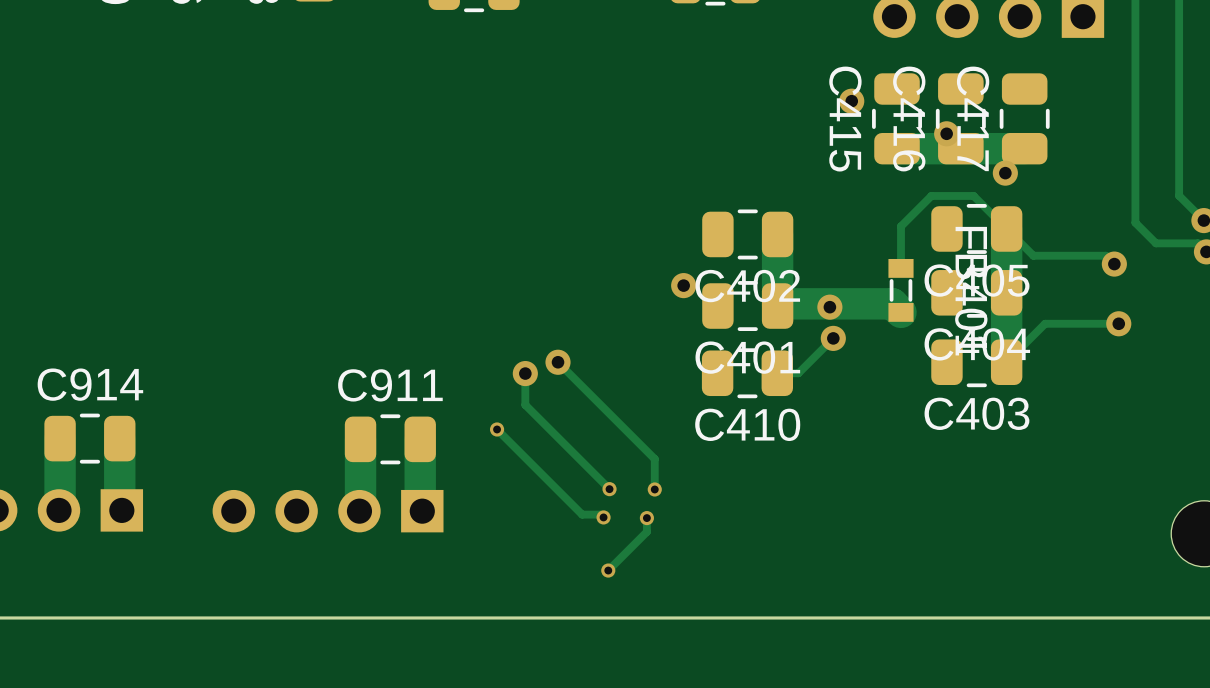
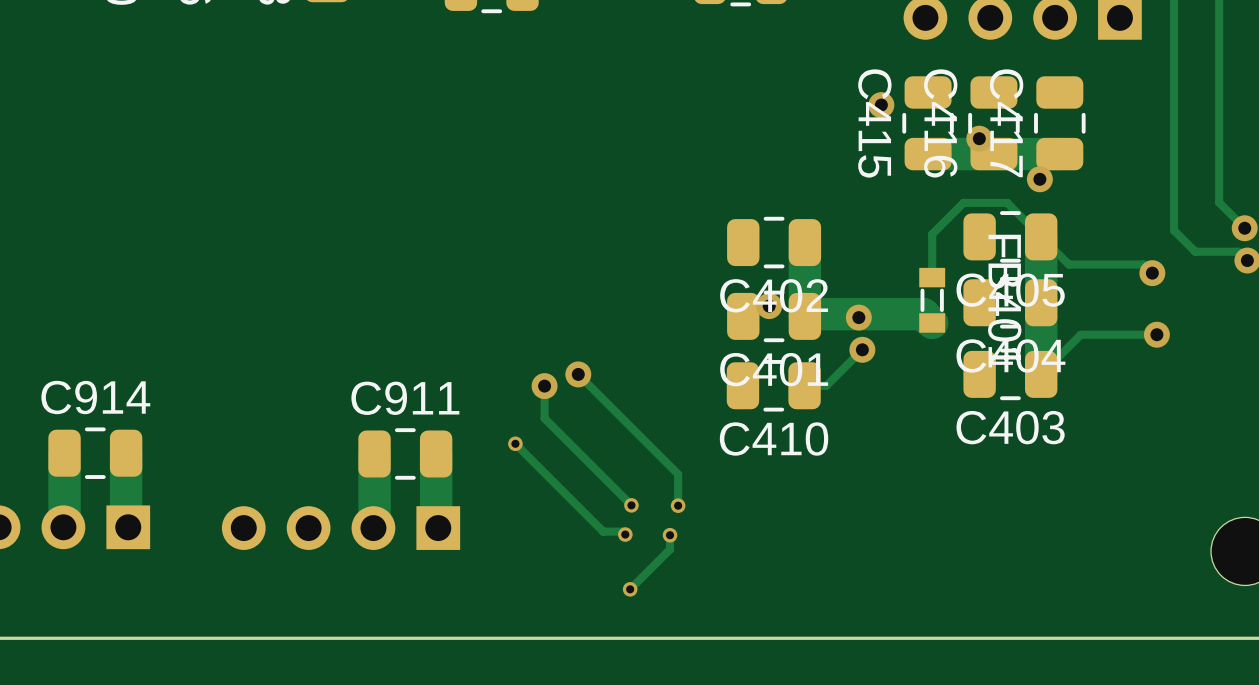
via position: (683, 285) -> (769, 306)

